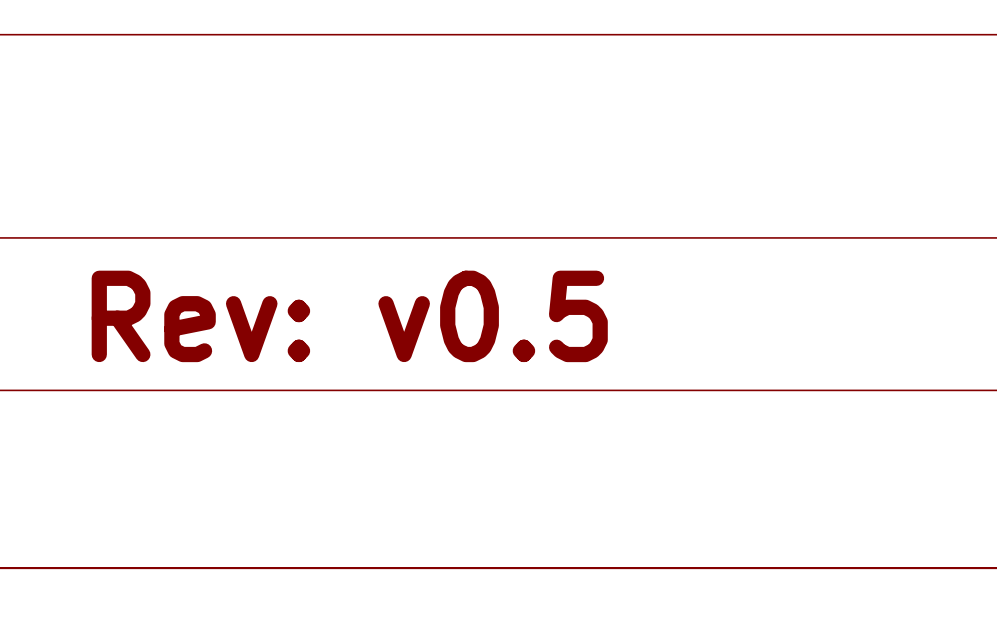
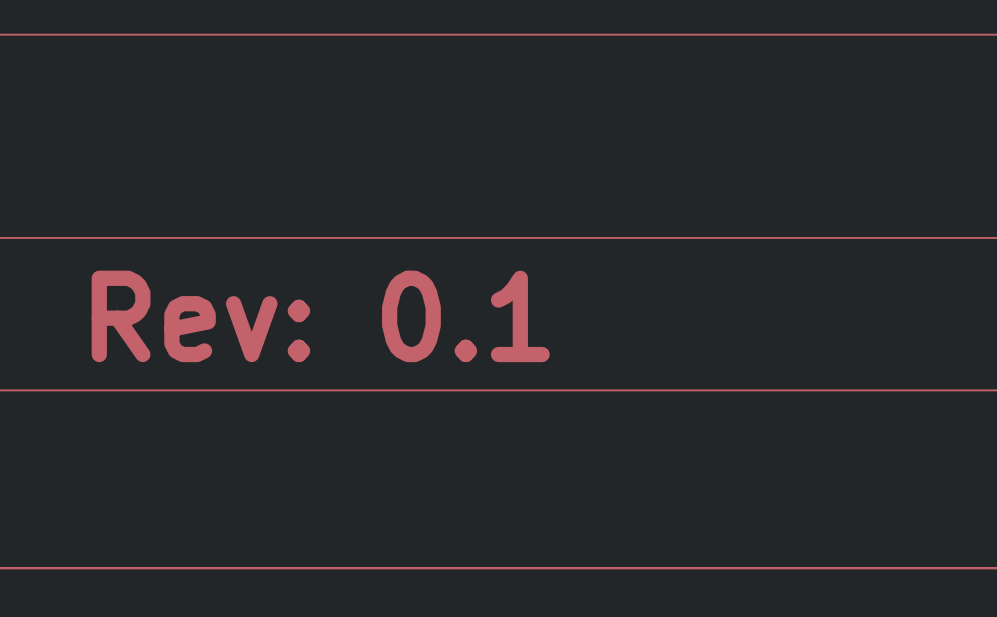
title block: Rev: v0.5 (349, 316) -> Rev: 0.1 (320, 316)

